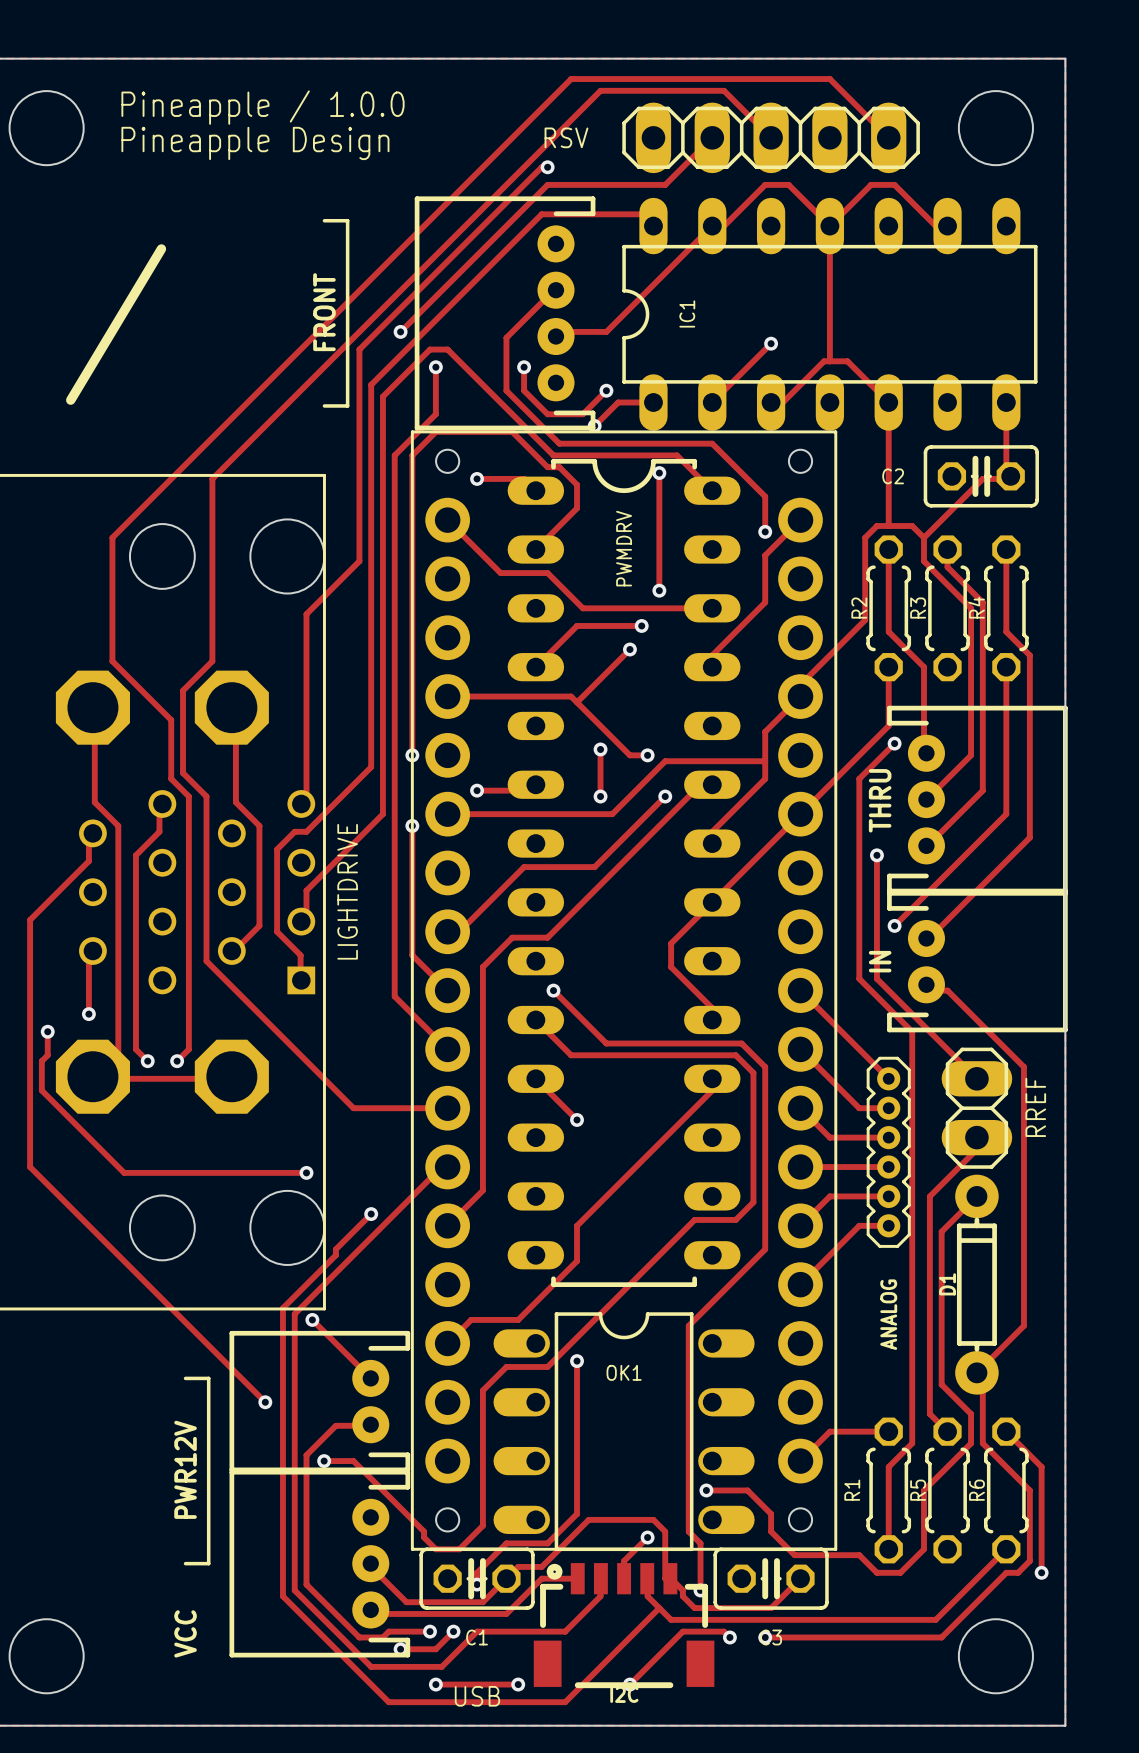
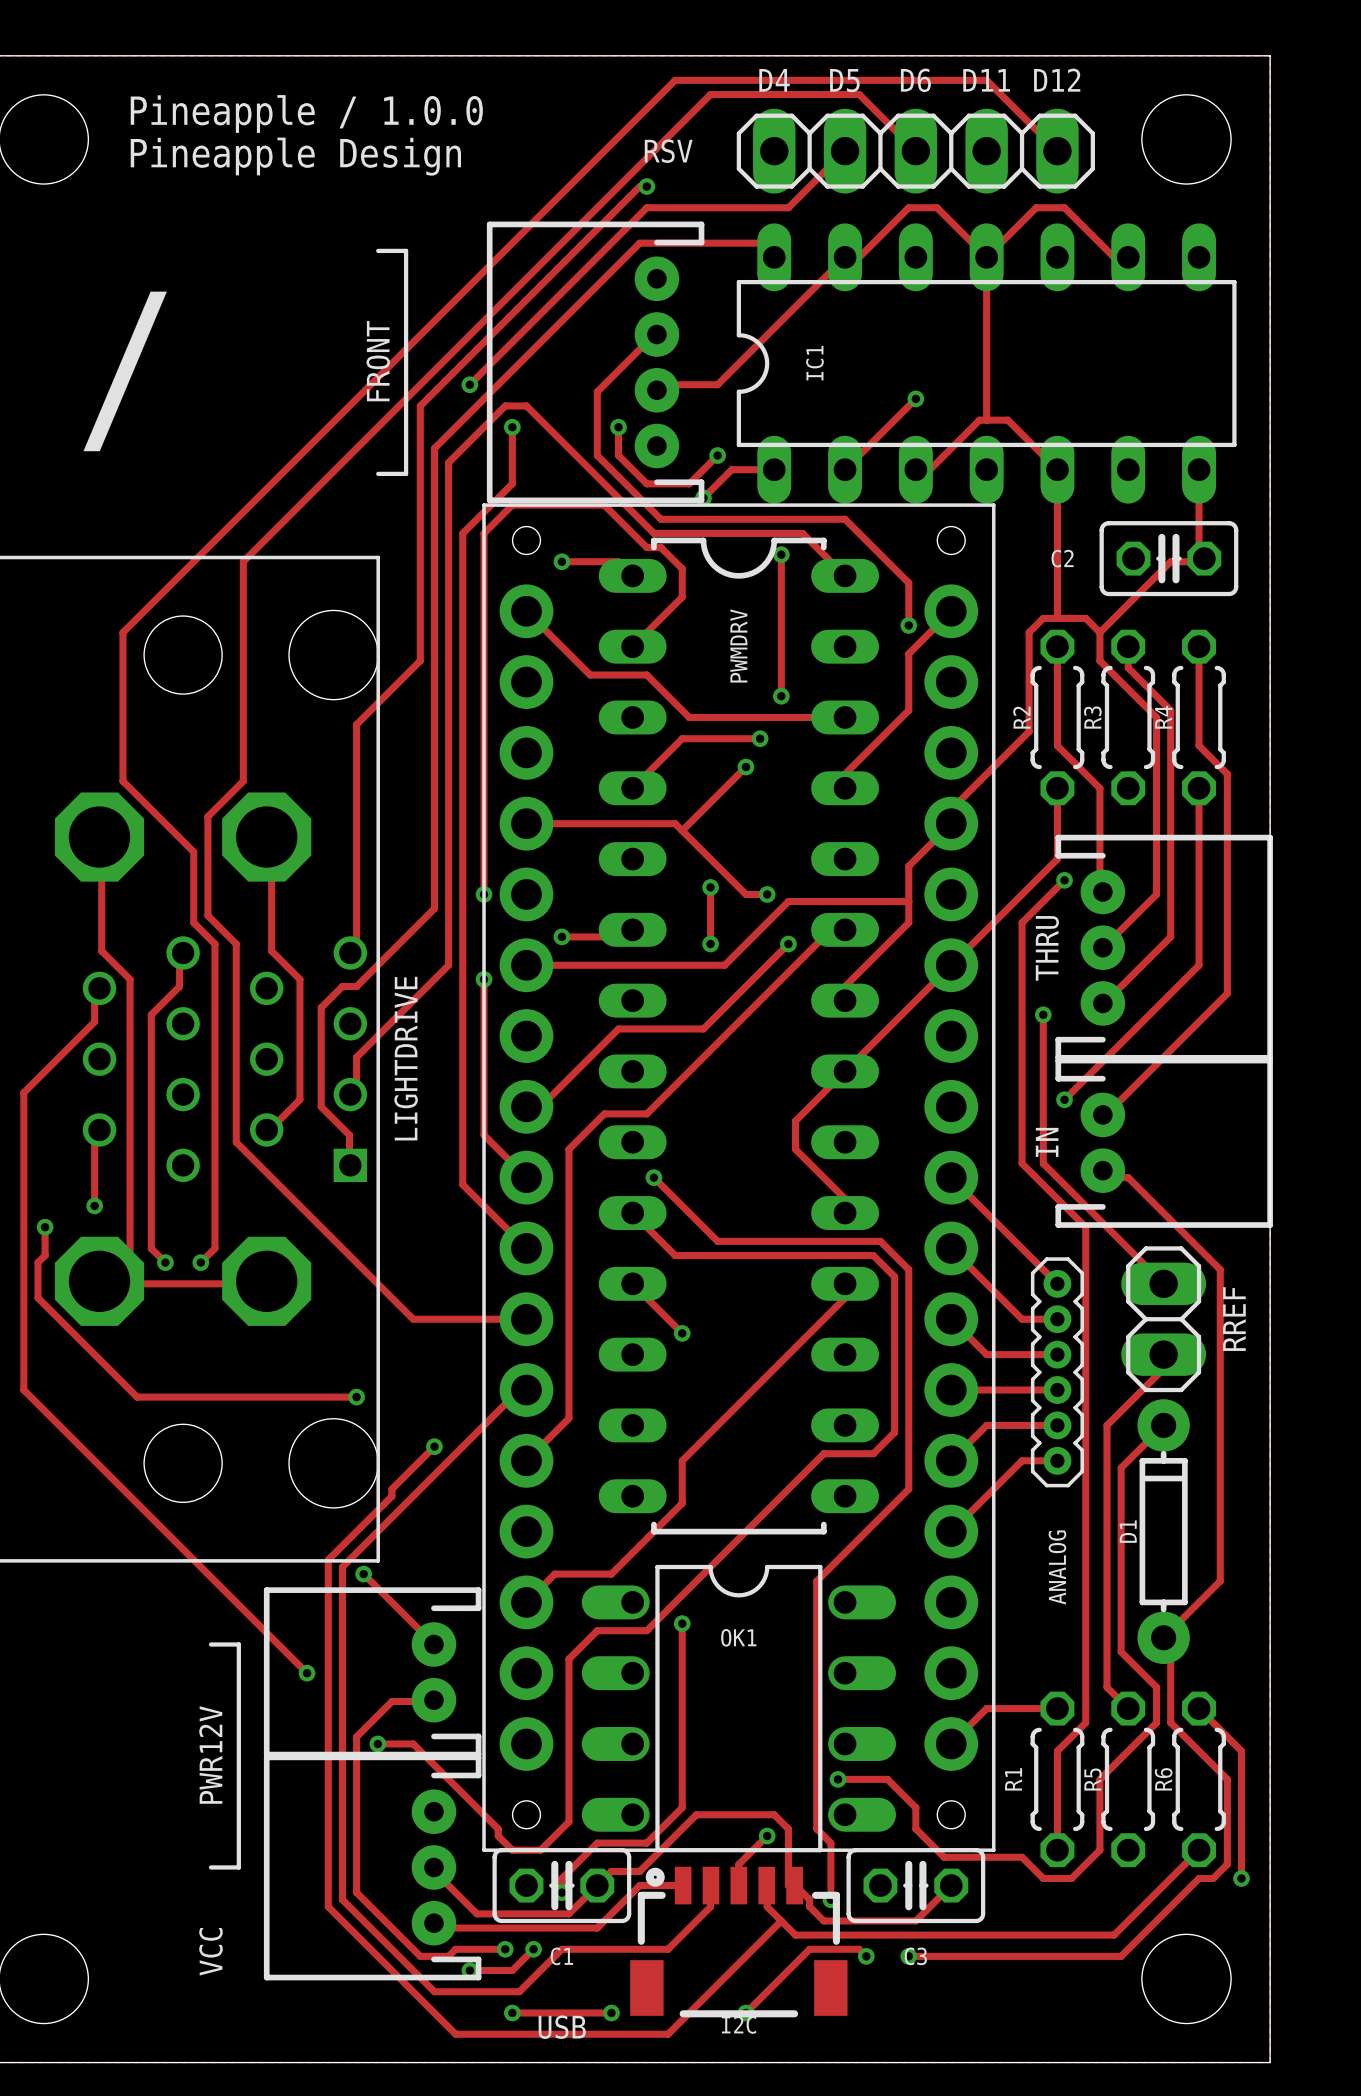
text: none -> D4 (774, 80)
text: none -> D5 (844, 80)
text: none -> D6 (915, 80)
text: none -> D11 (986, 80)
text: none -> D12 (1057, 80)

